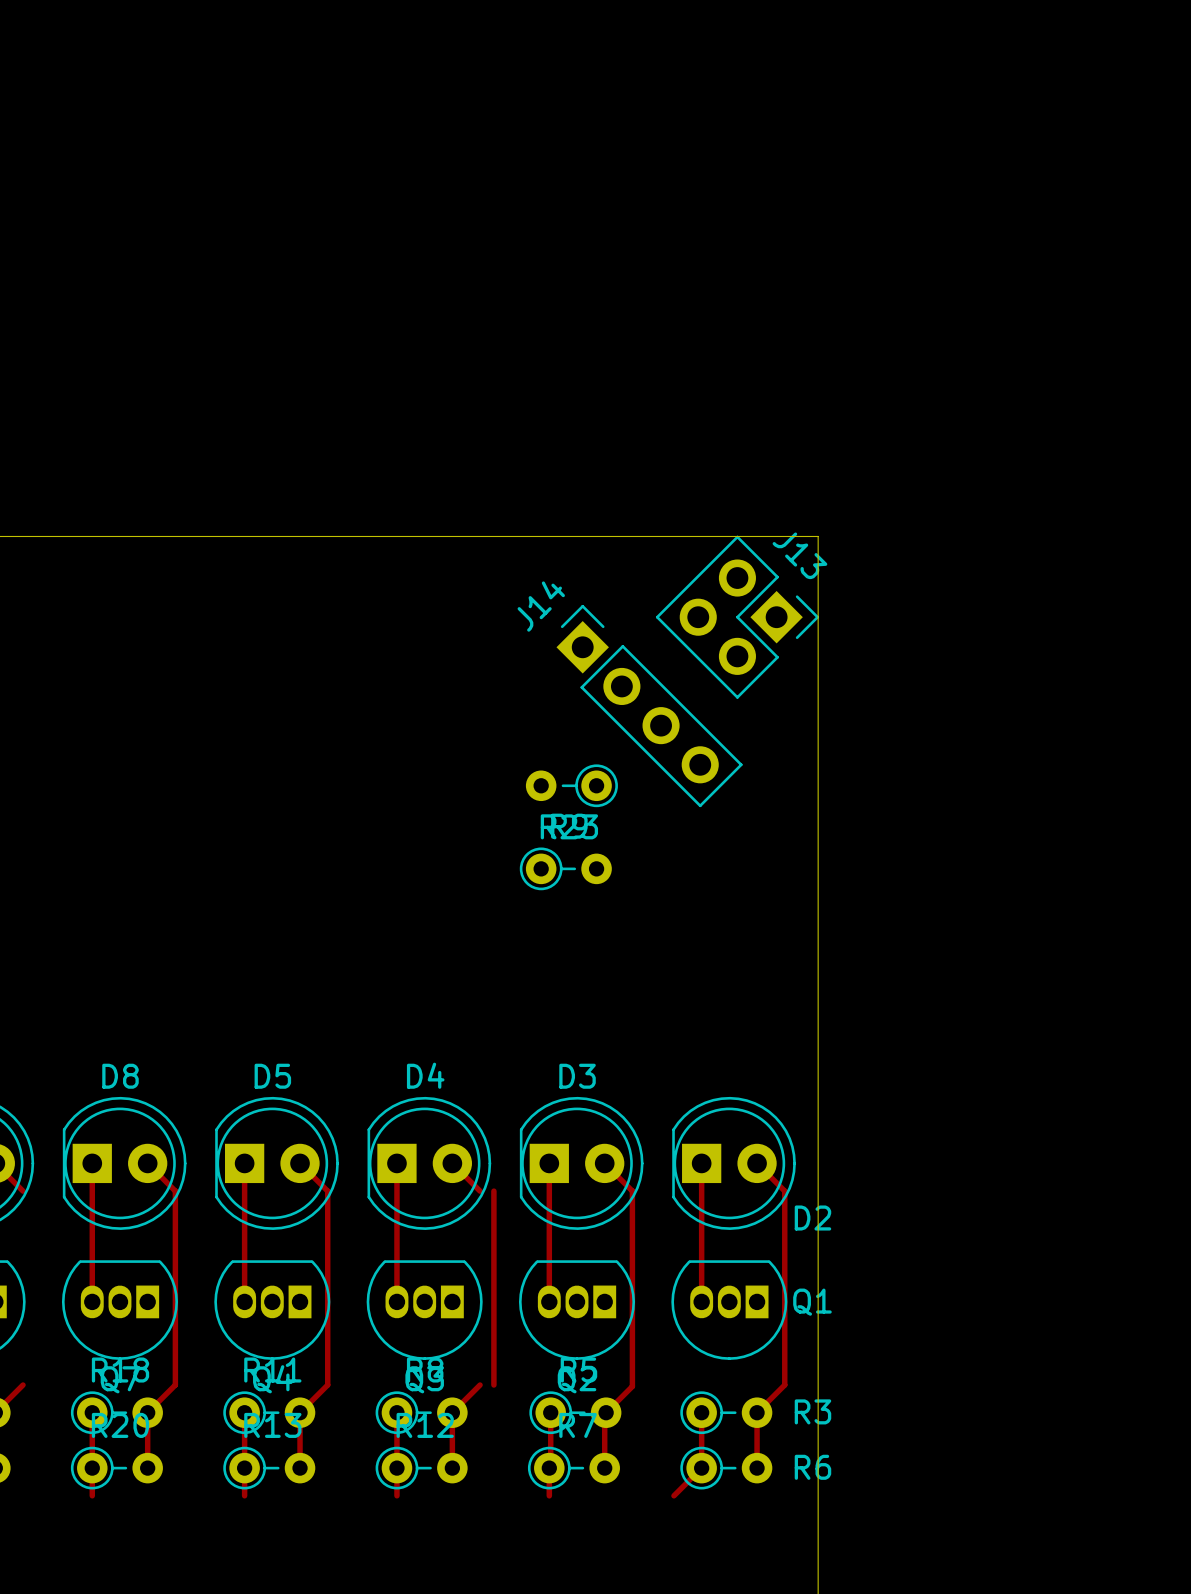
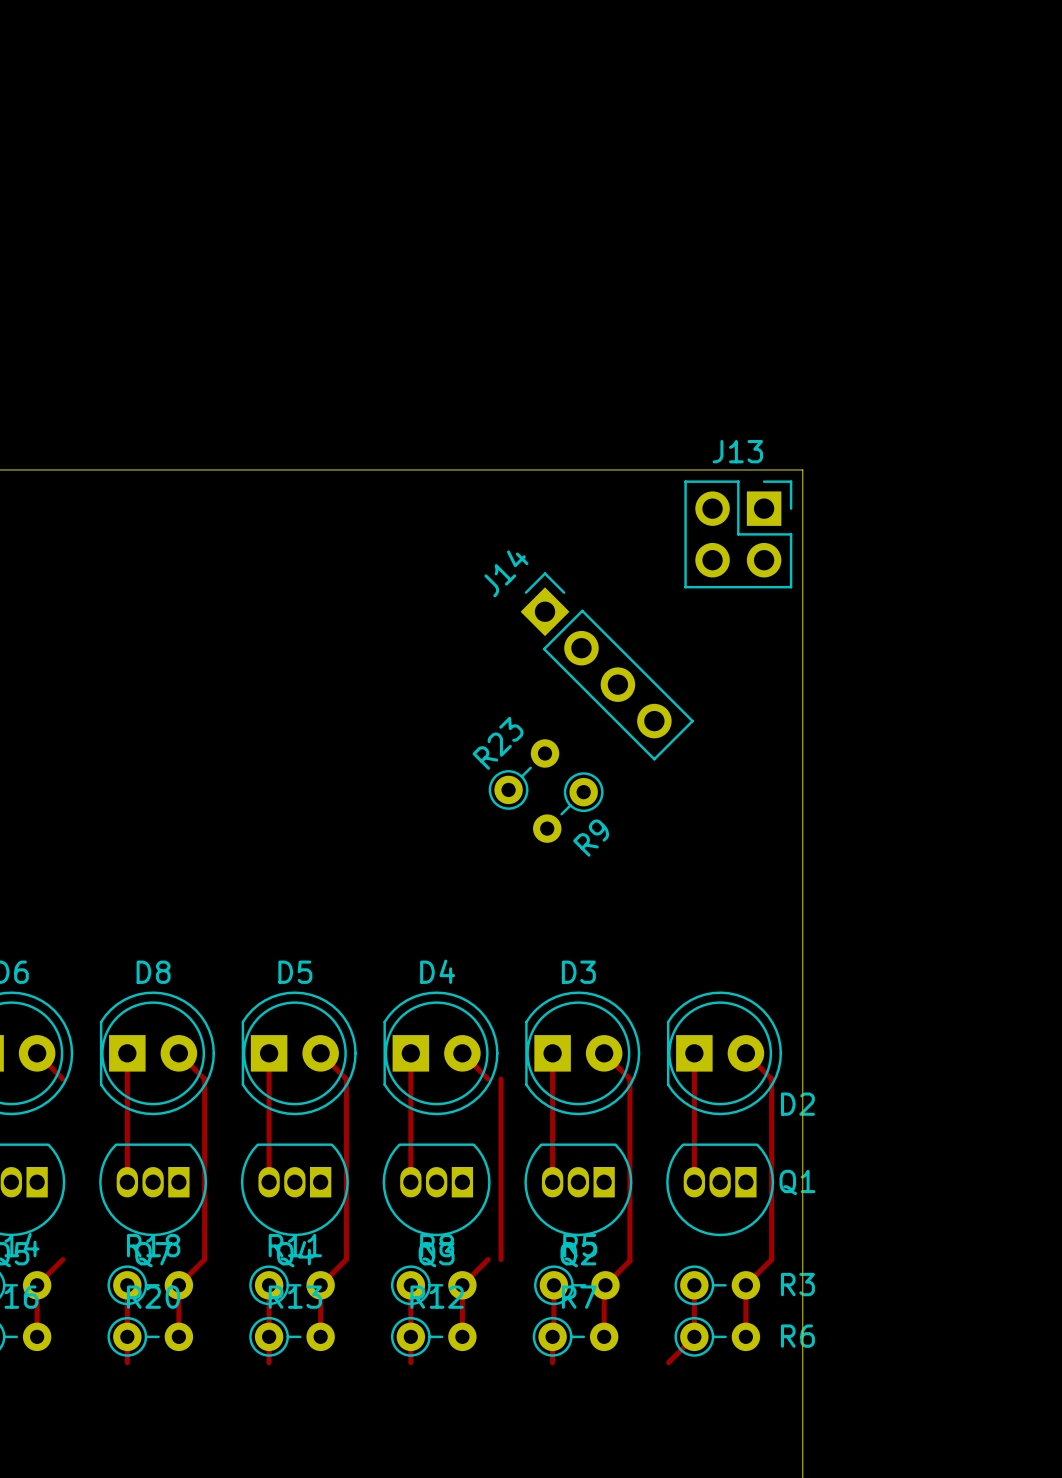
J13 rotation: 0° (737, 617) -> 45° counterclockwise (738, 534)
J14 position: (649, 706) -> (607, 666)
R23 rotation: 0° (571, 785) -> 135° clockwise (523, 774)
R23 position: (571, 785) -> (523, 774)
R9 rotation: 0° (565, 868) -> 135° clockwise (568, 807)

